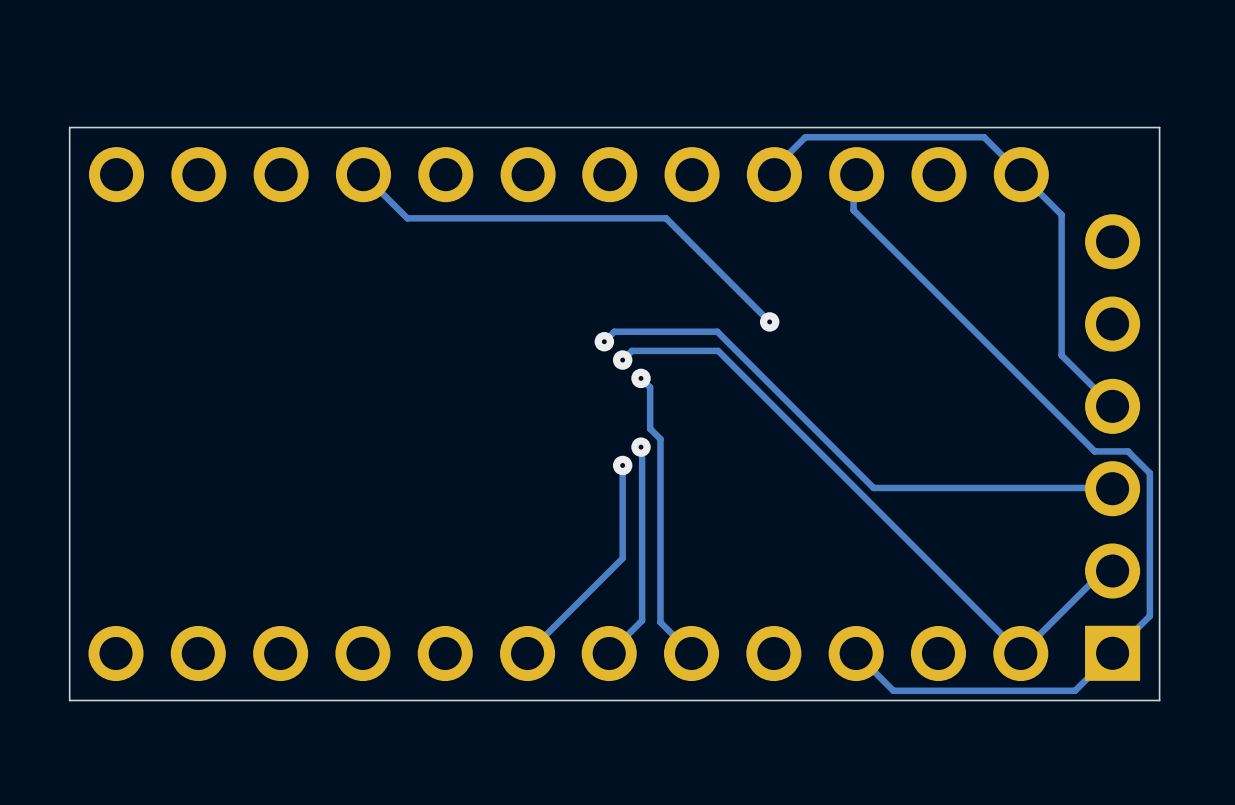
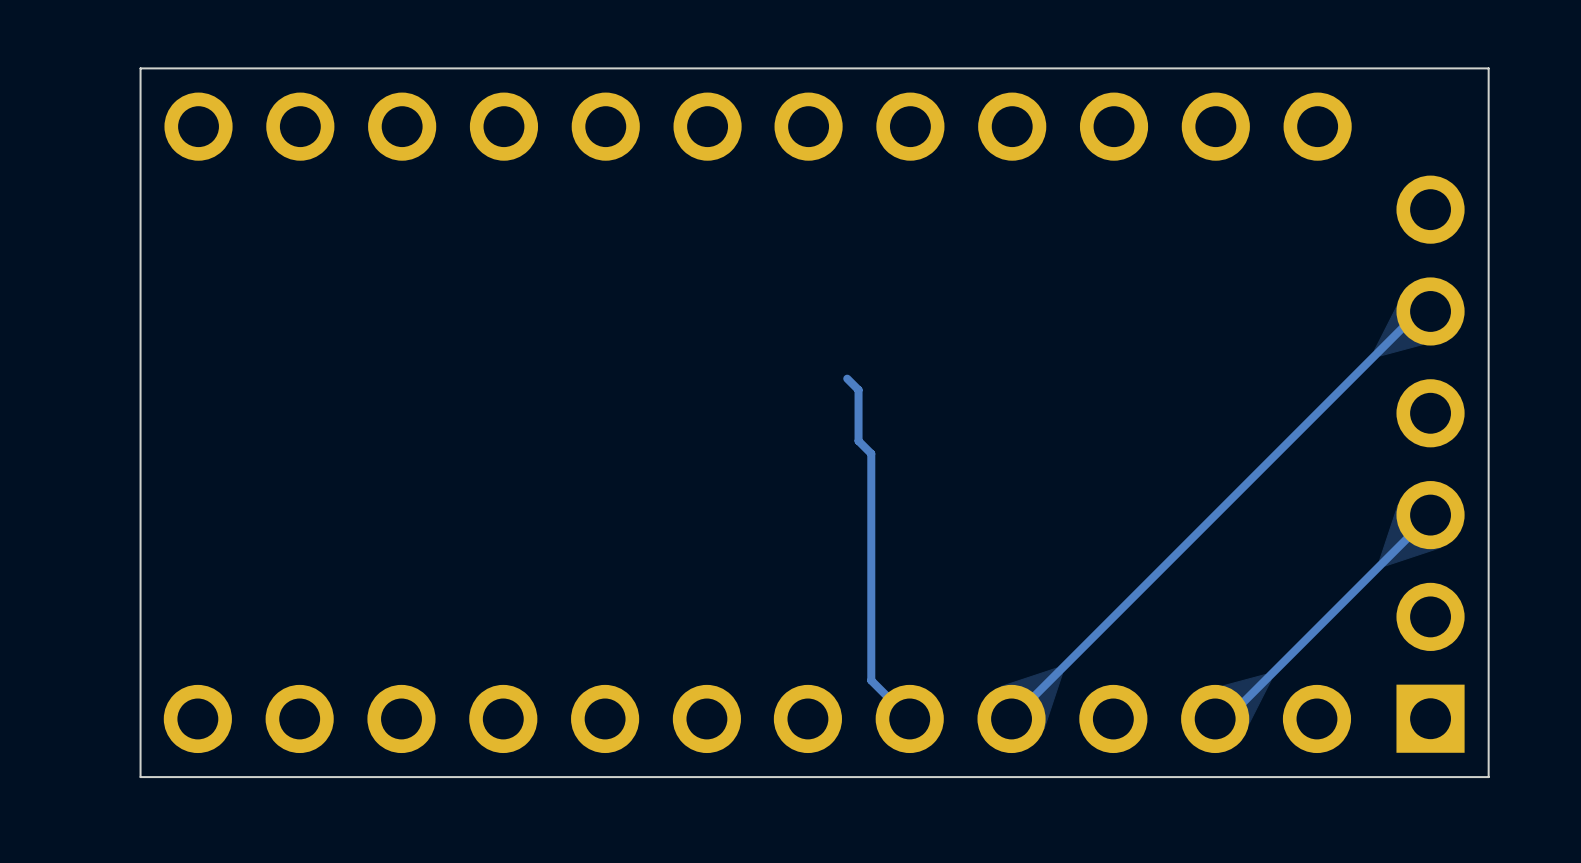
track: (360, 171) (407, 218) (666, 218) (769, 321) -> none
track: (771, 171) (805, 137) (984, 137) (1061, 214) (1061, 355) (1112, 406) -> none
track: (853, 171) (853, 210) (1094, 451) (1128, 451) (1149, 473) (1149, 616) (1075, 690) (893, 690) (856, 653) -> none
via: (769, 321) -> none
track: none -> (1430, 311) (1419, 311) (1011, 718)
track: (604, 341) (614, 331) (717, 331) (873, 487) (1111, 487) -> (1215, 718) (1226, 718) (1430, 515)
via: (604, 341) -> none
track: (622, 360) (631, 350) (718, 350) (1020, 653) (1103, 571) -> none
via: (622, 360) -> none
via: (641, 378) -> none
via: (641, 447) -> none
track: (642, 457) (642, 620) (609, 653) -> none
track: (622, 465) (622, 558) (527, 653) -> none
via: (622, 465) -> none

